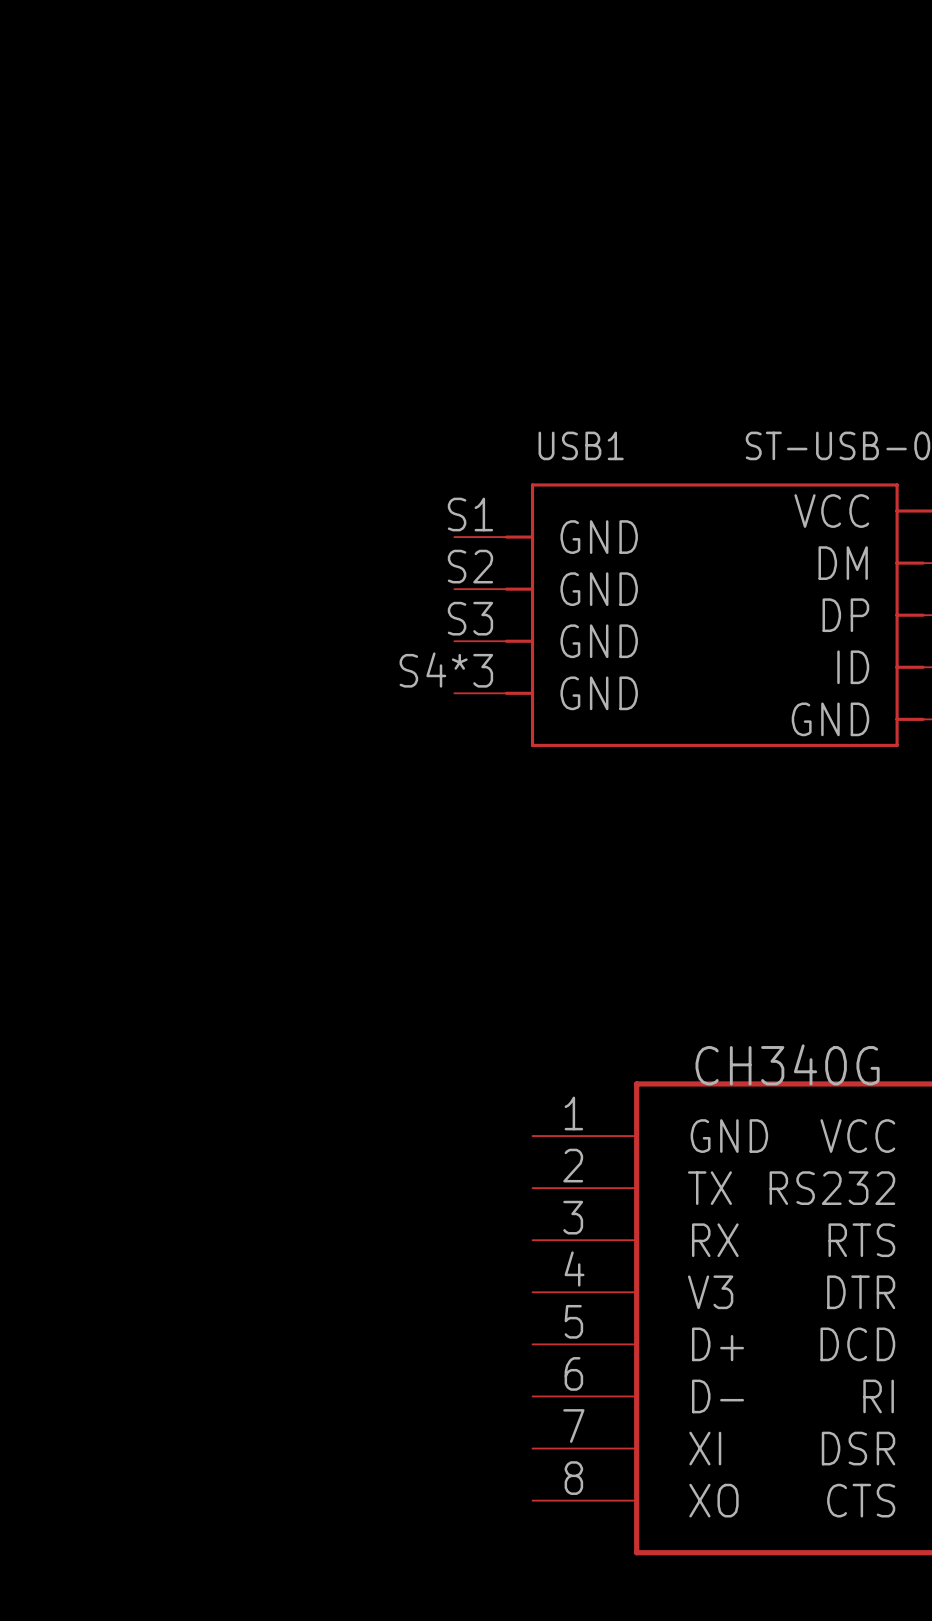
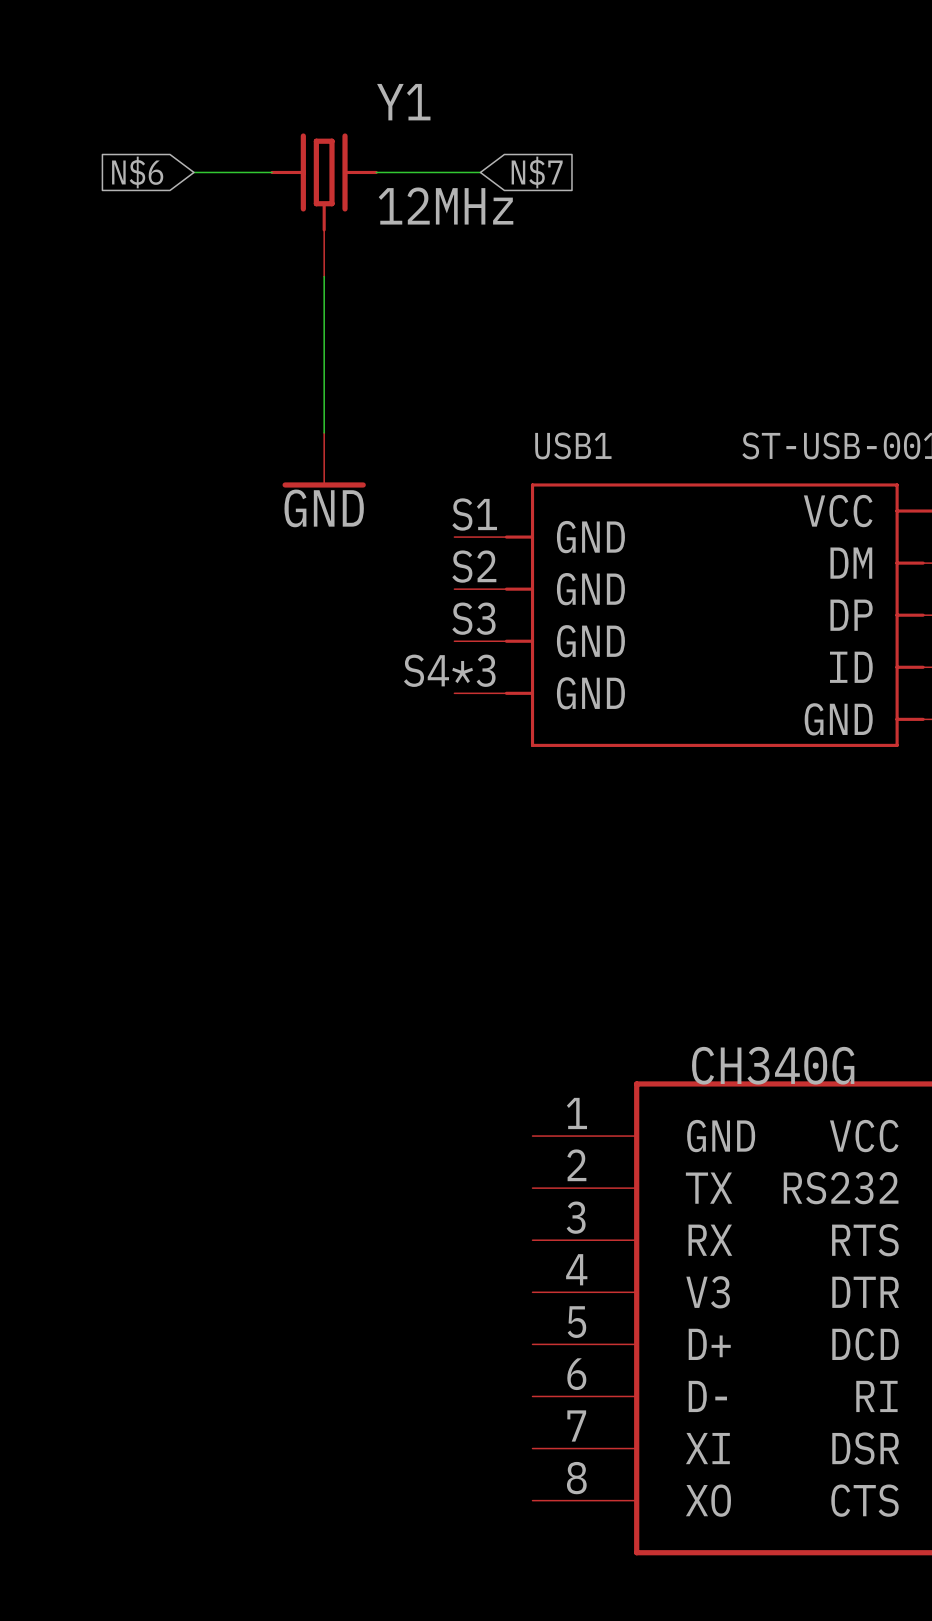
global label: none -> N$6 (137, 172)
wire: none -> (193, 172) (272, 172)
wire: none -> (376, 172) (480, 172)
global label: none -> N$7 (537, 172)
Y1: none -> 12MHz (324, 205)
wire: none -> (324, 276) (324, 432)
power symbol: none -> GND (324, 460)

